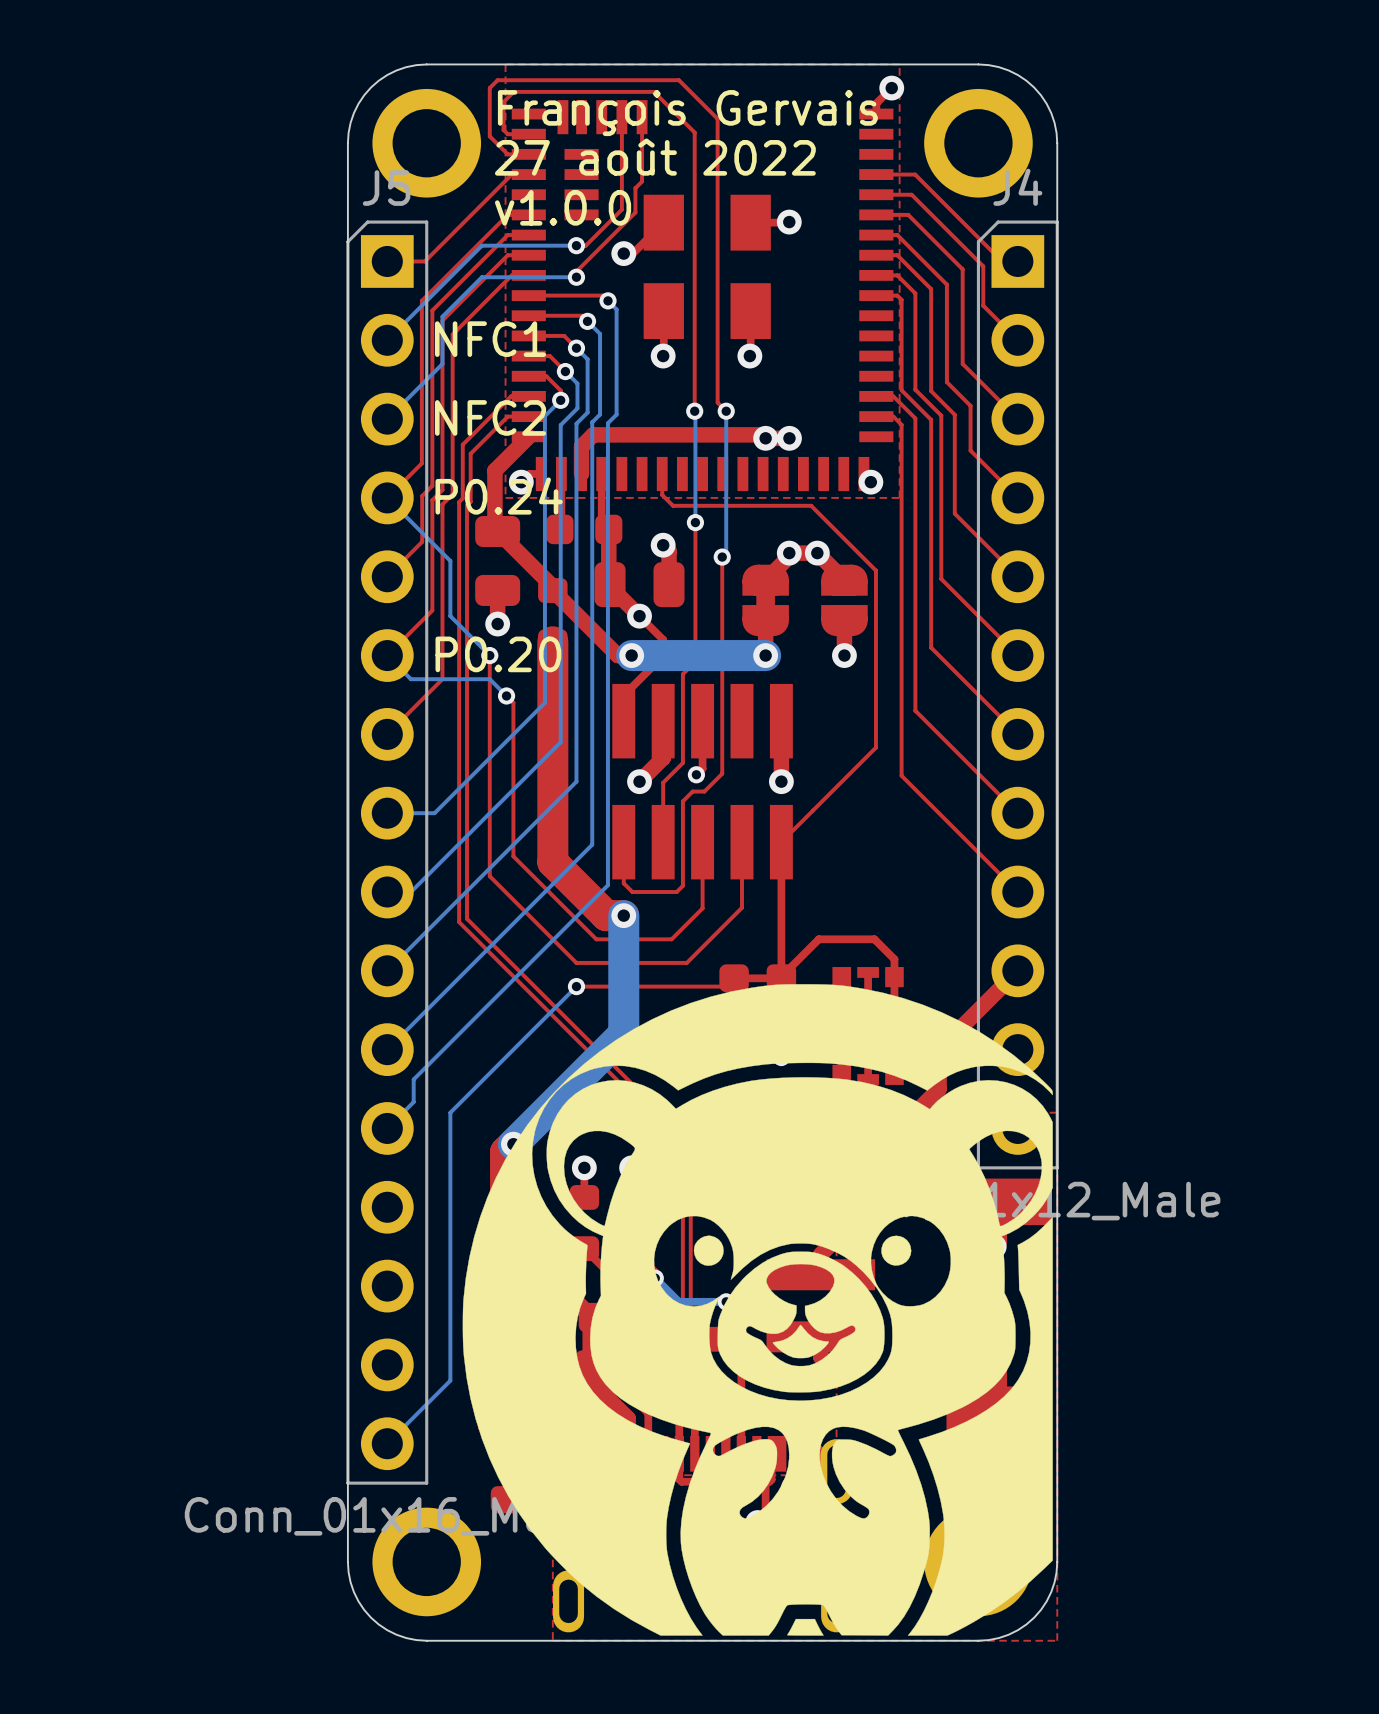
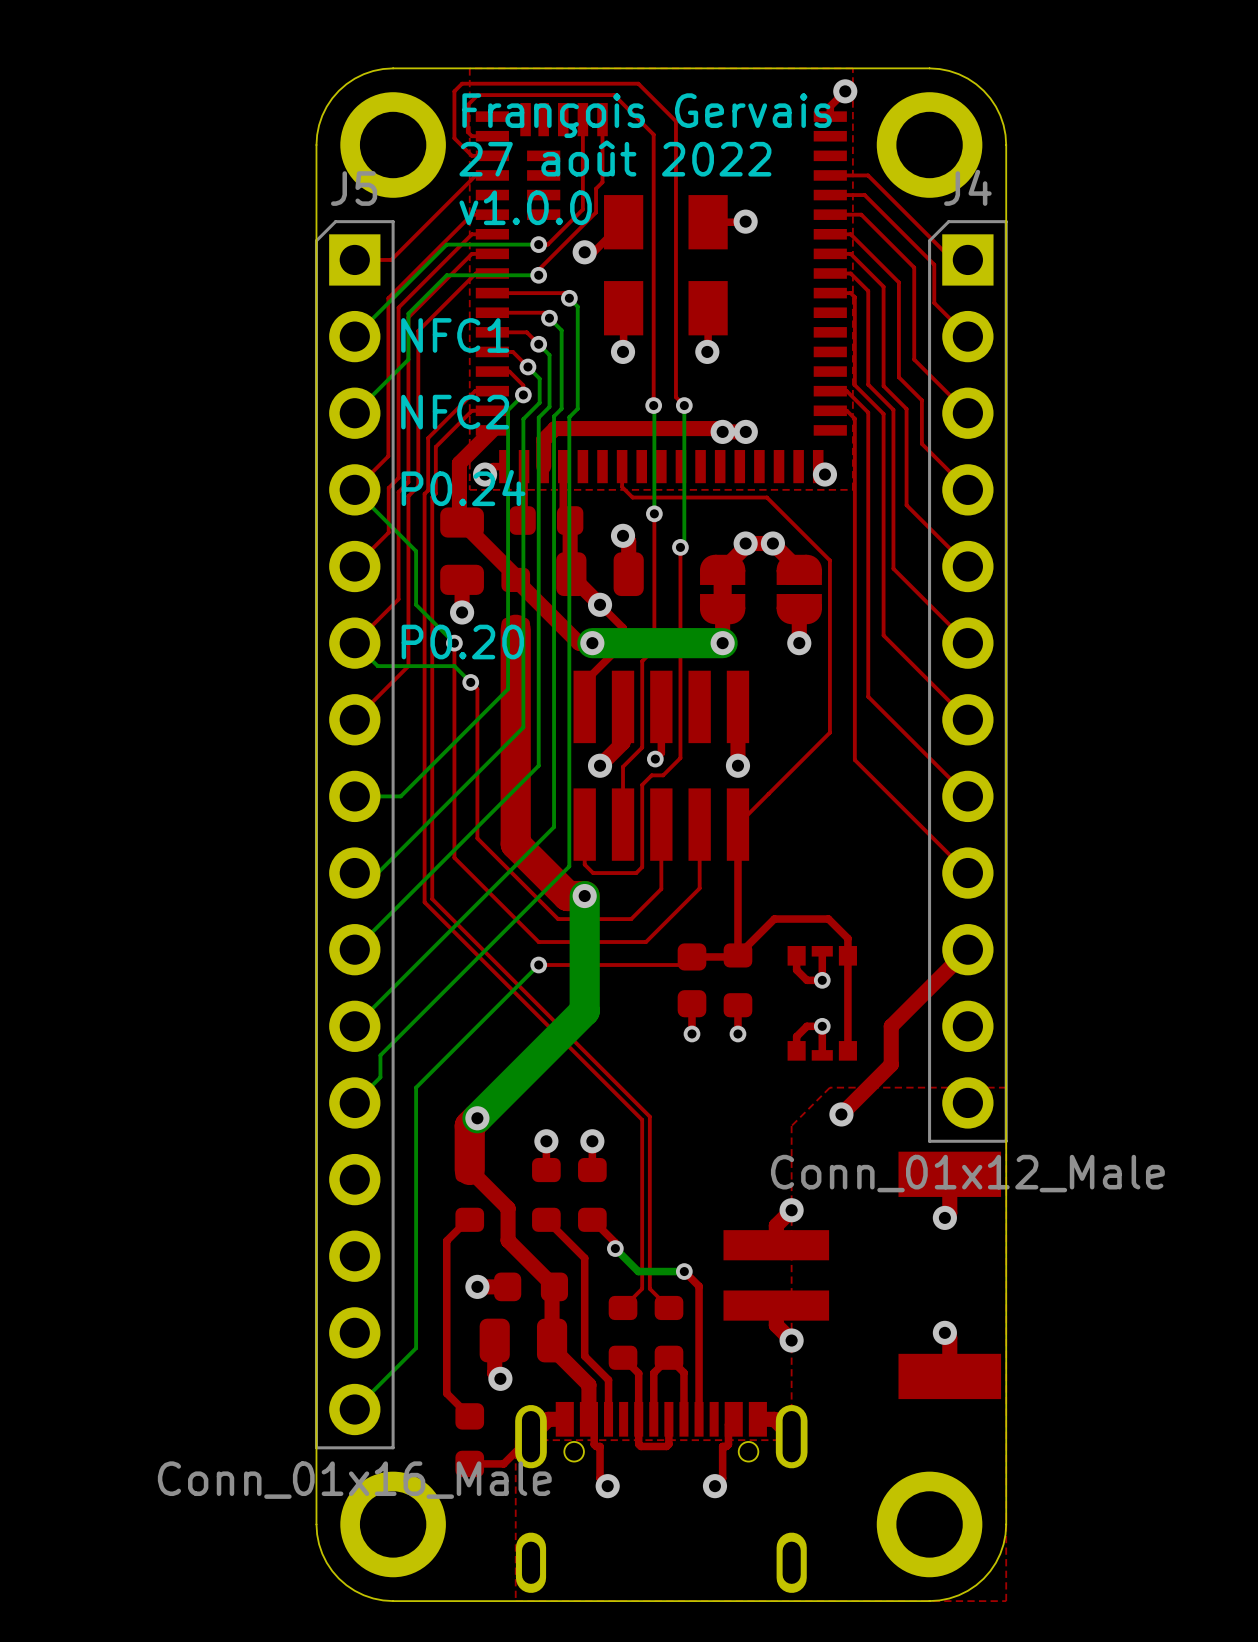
drawing: [462, 984, 1053, 1636] -> none

